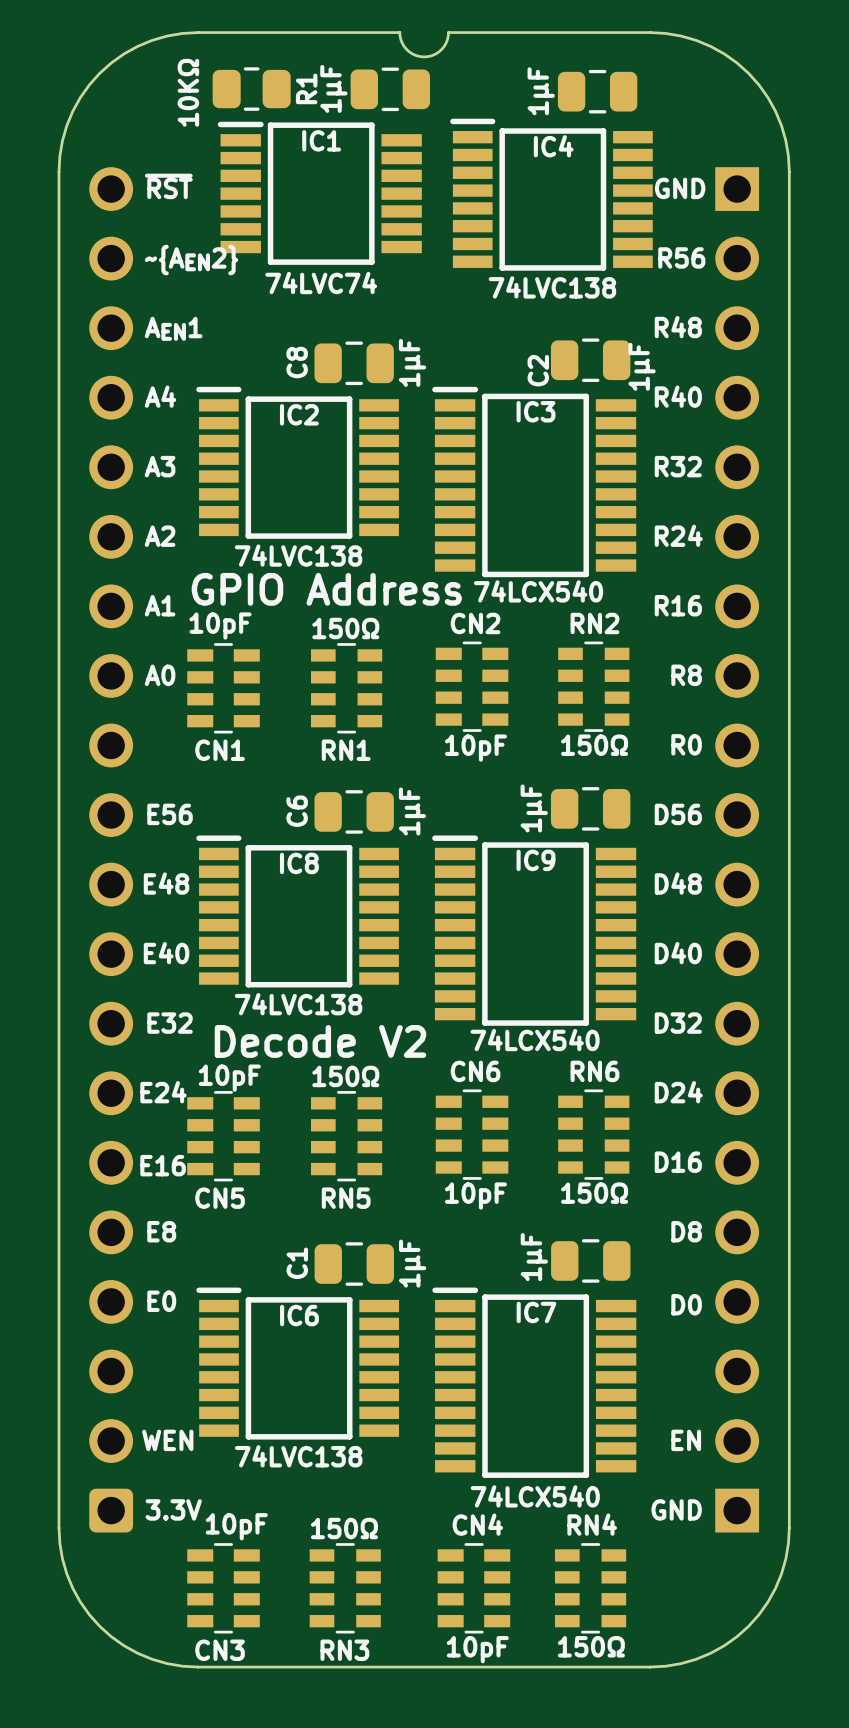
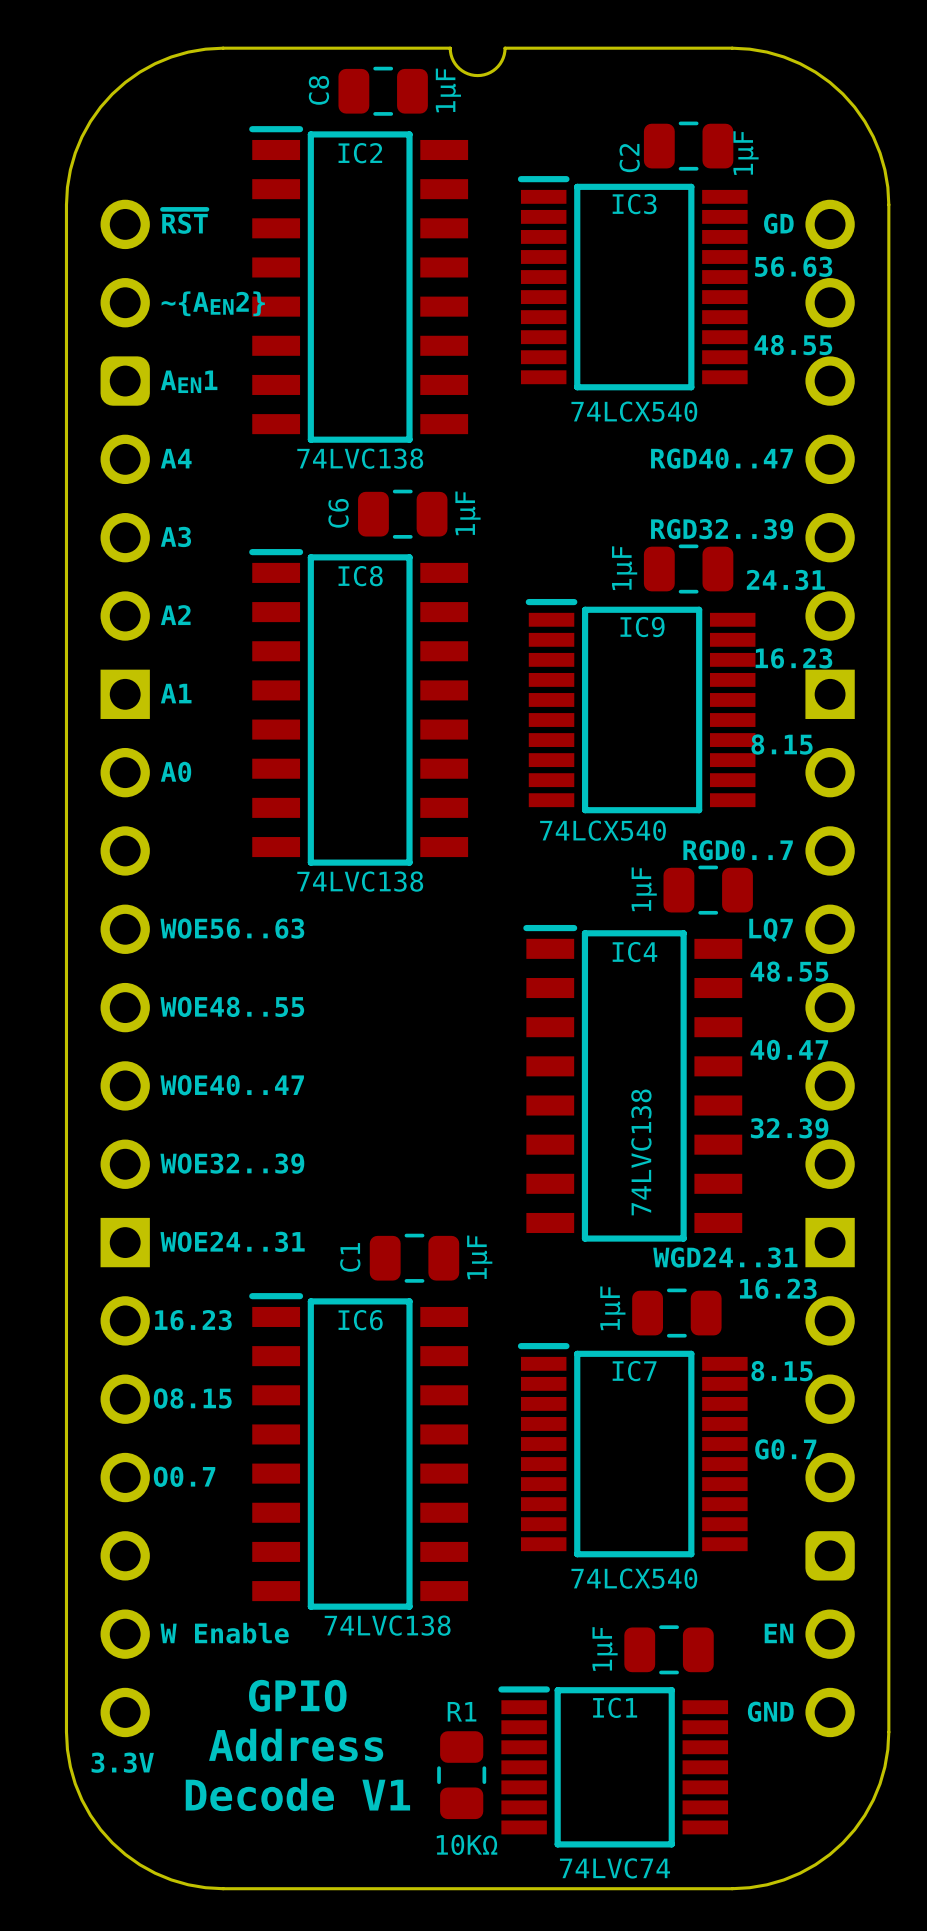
part footprint: [57, 31, 791, 1669] -> [64, 46, 891, 1891]
R1 name position: R1 (306, 88) -> R1 (462, 1711)
R1 rotation: 0° (251, 89) -> 90° clockwise (461, 1775)
R1 position: (251, 89) -> (461, 1775)
part: 1μF (390, 89) -> none
part: 1μF (597, 91) -> none
R1 value position: 10KΩ (188, 92) -> 10KΩ (467, 1844)
IC4 footprint: [450, 118, 653, 271] -> [523, 924, 743, 1242]
IC4 name position: IC4 (553, 146) -> IC4 (634, 952)
text: GND (680, 188) -> GD (778, 223)
IC1 position: (319, 193) -> (613, 1766)
text: none -> 56.63 (793, 266)
text: R56 (681, 257) -> none
IC4 text: 74LVC138 (552, 287) -> none
text: none -> 48.55 (793, 345)
text: R48 (678, 327) -> none
C2 position: (590, 360) -> (688, 146)
C8 position: (354, 363) -> (383, 91)
IC2 footprint: [196, 386, 399, 539] -> [249, 126, 469, 443]
text: R40 (678, 396) -> RGD40..47 (721, 458)
IC2 name position: IC2 (299, 414) -> IC2 (360, 153)
text: R32 (678, 466) -> RGD32..39 (722, 529)
IC3 position: (534, 482) -> (632, 283)
part: none -> 1μF (688, 569)
text: none -> 24.31 (785, 580)
text: R24 (678, 535) -> none
IC2 text: 74LVC138 (298, 555) -> none
text: none -> 16.23 (793, 658)
text: GPIO Address (326, 589) -> none
IC3 text position: 74LCX540 (538, 591) -> 74LCX540 (634, 411)
text: R16 (678, 605) -> none
text: none -> 8.15 (782, 744)
text: R8 (686, 675) -> none
CN2: (472, 686) -> none
RN2: (593, 686) -> none
CN1: (223, 688) -> none
RN1: (346, 688) -> none
text: R0 (686, 744) -> RGD0..7 (738, 850)
part position: (590, 808) -> (708, 890)
C6 position: (354, 811) -> (402, 514)
text: E56 (170, 814) -> WOE56..63 (232, 928)
text: D56 (678, 814) -> LQ7 (771, 930)
IC8 footprint: [196, 835, 399, 988] -> [249, 549, 469, 866]
text: none -> 48.55 (789, 971)
IC8 name position: IC8 (299, 863) -> IC8 (360, 576)
text: E48 (166, 883) -> WOE48..55 (232, 1006)
text: D48 (678, 883) -> none
text: none -> 40.47 (789, 1049)
IC9 position: (534, 930) -> (640, 706)
text: E40 (166, 953) -> WOE40..47 (232, 1085)
text: D40 (678, 953) -> none
text: none -> 32.39 (789, 1128)
IC8 text: 74LVC138 (298, 1004) -> none
text: E32 (170, 1023) -> WOE32..39 (232, 1163)
text: D32 (678, 1023) -> none
IC9 text position: 74LCX540 (535, 1040) -> 74LCX540 (603, 830)
text: Decode V2 (320, 1041) -> none
text: E24 (163, 1092) -> WOE24..31 (232, 1241)
text: D24 (678, 1092) -> WGD24..31 (725, 1257)
CN6: (472, 1134) -> none
RN6: (593, 1134) -> none
text: none -> 16.23 (778, 1288)
CN5: (223, 1136) -> none
RN5: (346, 1136) -> none
part: none -> 1μF (676, 1313)
text: D16 (678, 1162) -> none
text: E16 (163, 1165) -> 16.23 (193, 1320)
text: none -> 8.15 (782, 1371)
text: E8 (161, 1231) -> O8.15 (192, 1398)
text: D8 (686, 1231) -> none
part: 1μF (590, 1260) -> none
C1 position: (354, 1264) -> (414, 1258)
text: none -> G0.7 (785, 1449)
IC6 footprint: [196, 1287, 400, 1440] -> [249, 1293, 469, 1610]
text: E0 (161, 1301) -> O0.7 (184, 1476)
text: D0 (686, 1304) -> none
IC6 name position: IC6 (299, 1315) -> IC6 (360, 1320)
IC7 position: (534, 1382) -> (632, 1450)
text: WEN (167, 1440) -> W Enable (224, 1633)
part: none -> 1μF (669, 1649)
IC6 text: 74LVC138 (298, 1456) -> none
text: none -> GPIO (297, 1695)
text position: 3.3V (173, 1509) -> 3.3V (122, 1762)
text: none -> Address (296, 1745)
text: none -> Decode V1 (297, 1794)
CN3: (223, 1588) -> none
RN3: (345, 1588) -> none
CN4: (473, 1588) -> none
RN4: (590, 1588) -> none

